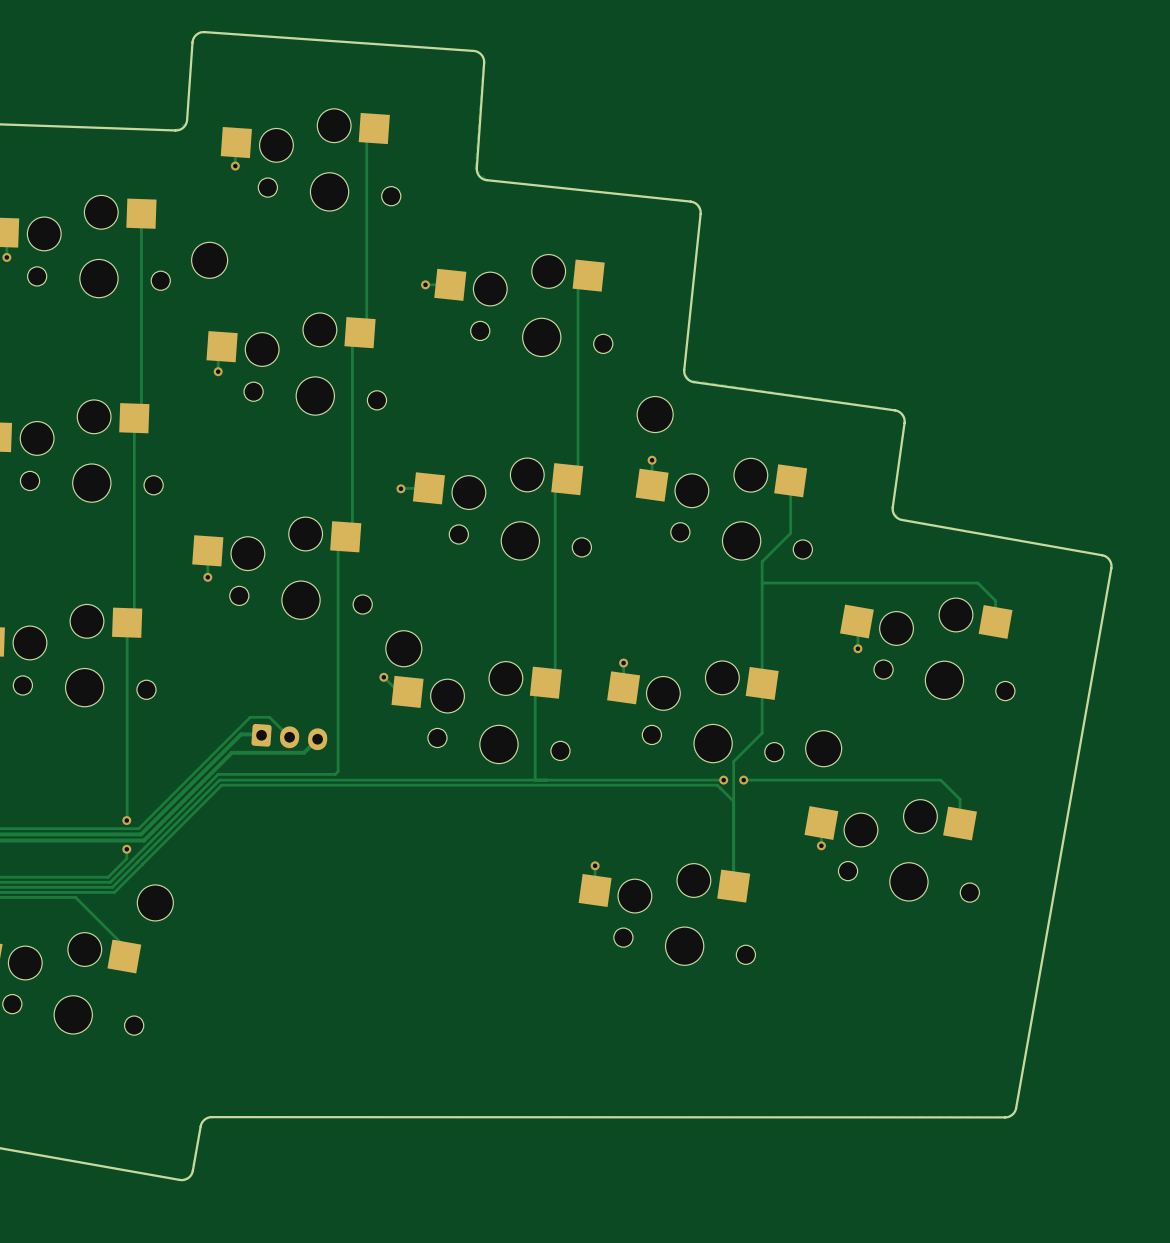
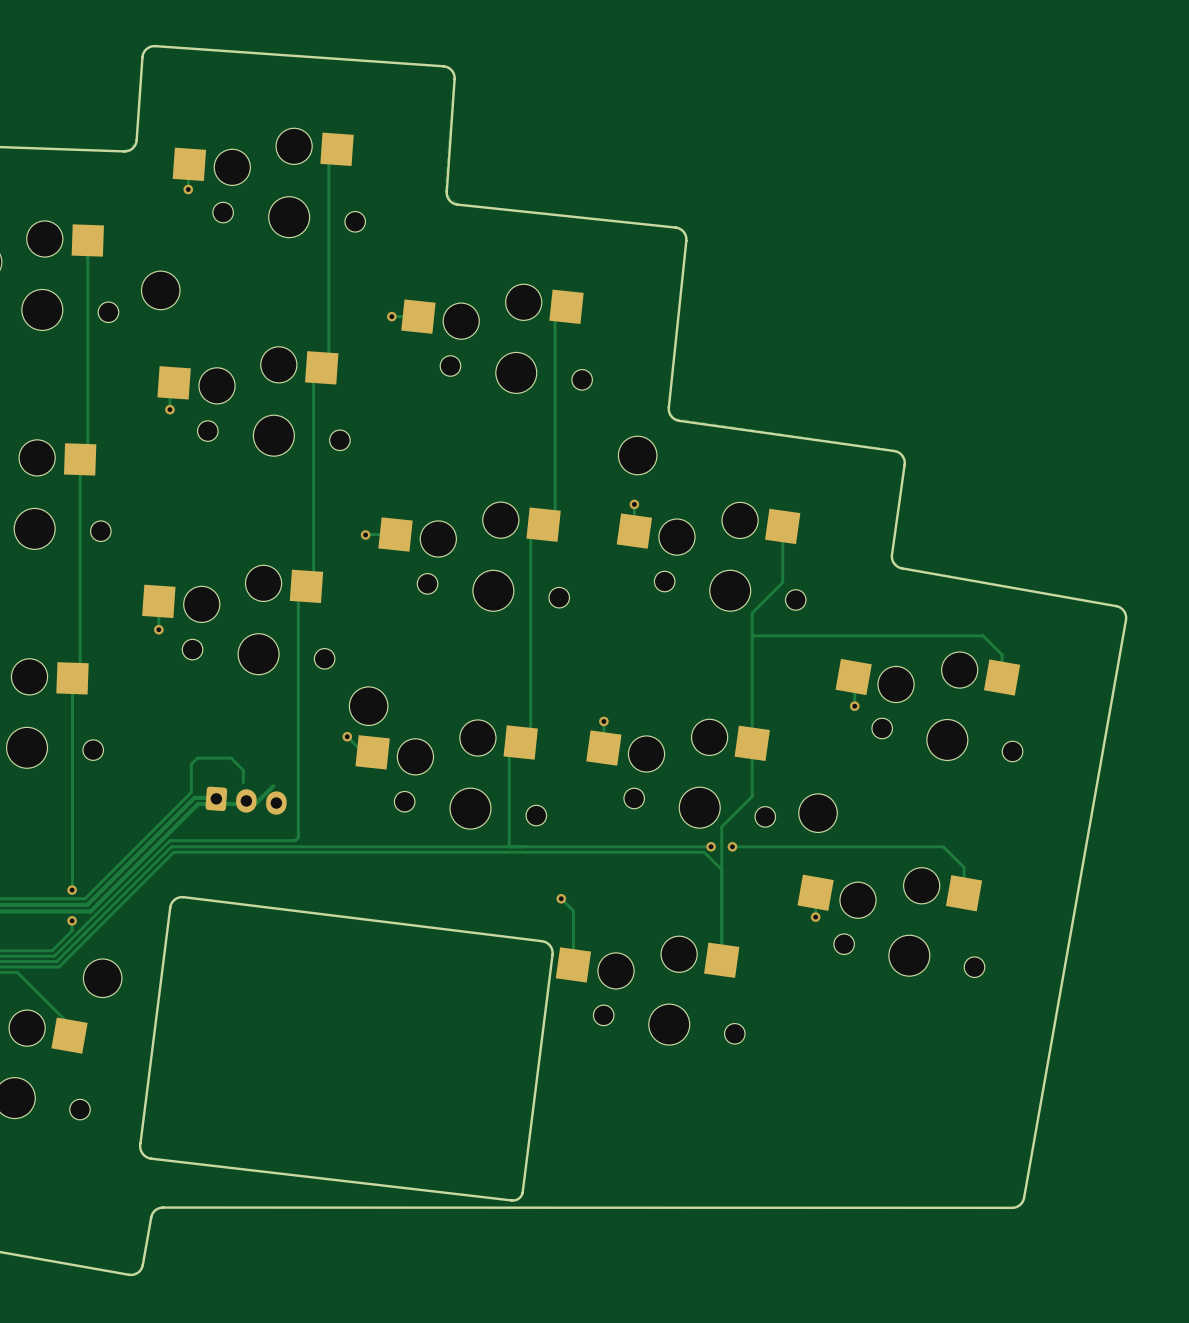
track: (238, 729) (250, 717) (269, 717) (289, 737) -> (191, 792) (191, 764) (197, 758) (231, 758) (243, 770) (243, 782)
track: (317, 739) (304, 752) (231, 752) -> (273, 786) (255, 804) (198, 804) (184, 817)
board edge: none -> (183, 897) (542, 941) (549, 944) (552, 954) (522, 1192) (520, 1197) (511, 1200) (151, 1158) (144, 1155) (140, 1144) (170, 907) (174, 899) (183, 897)
track: none -> (561, 898) (573, 910) (573, 938)
via position: (595, 865) -> (561, 898)

